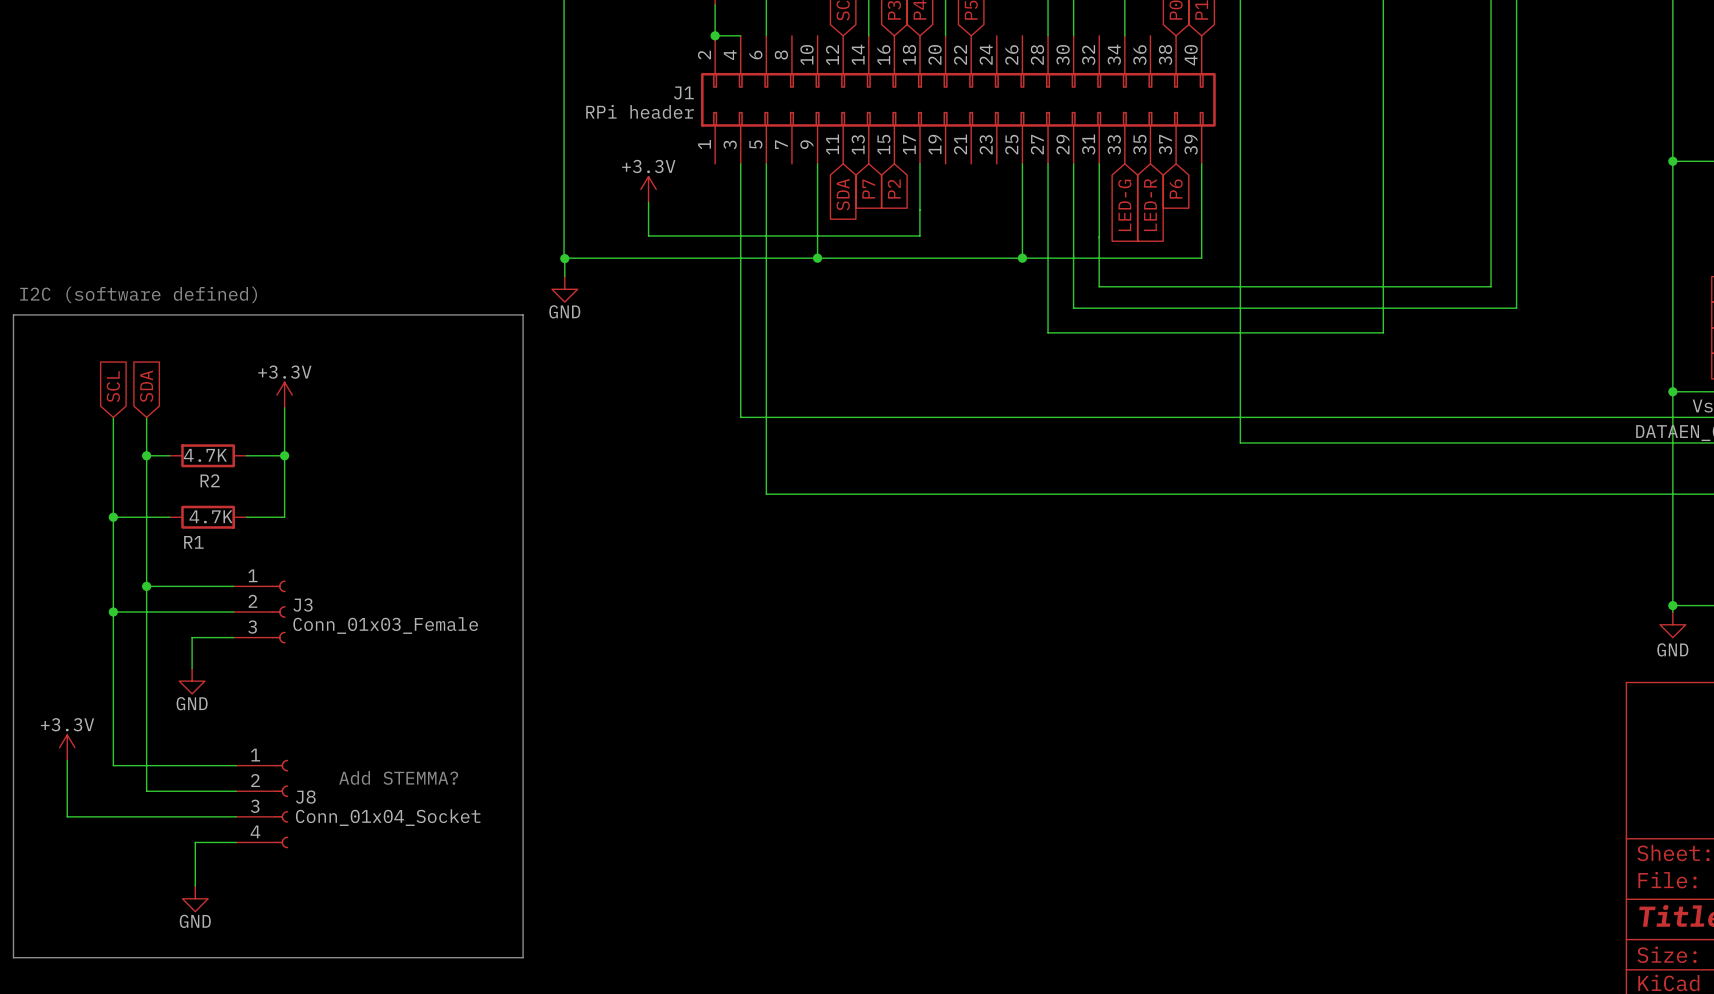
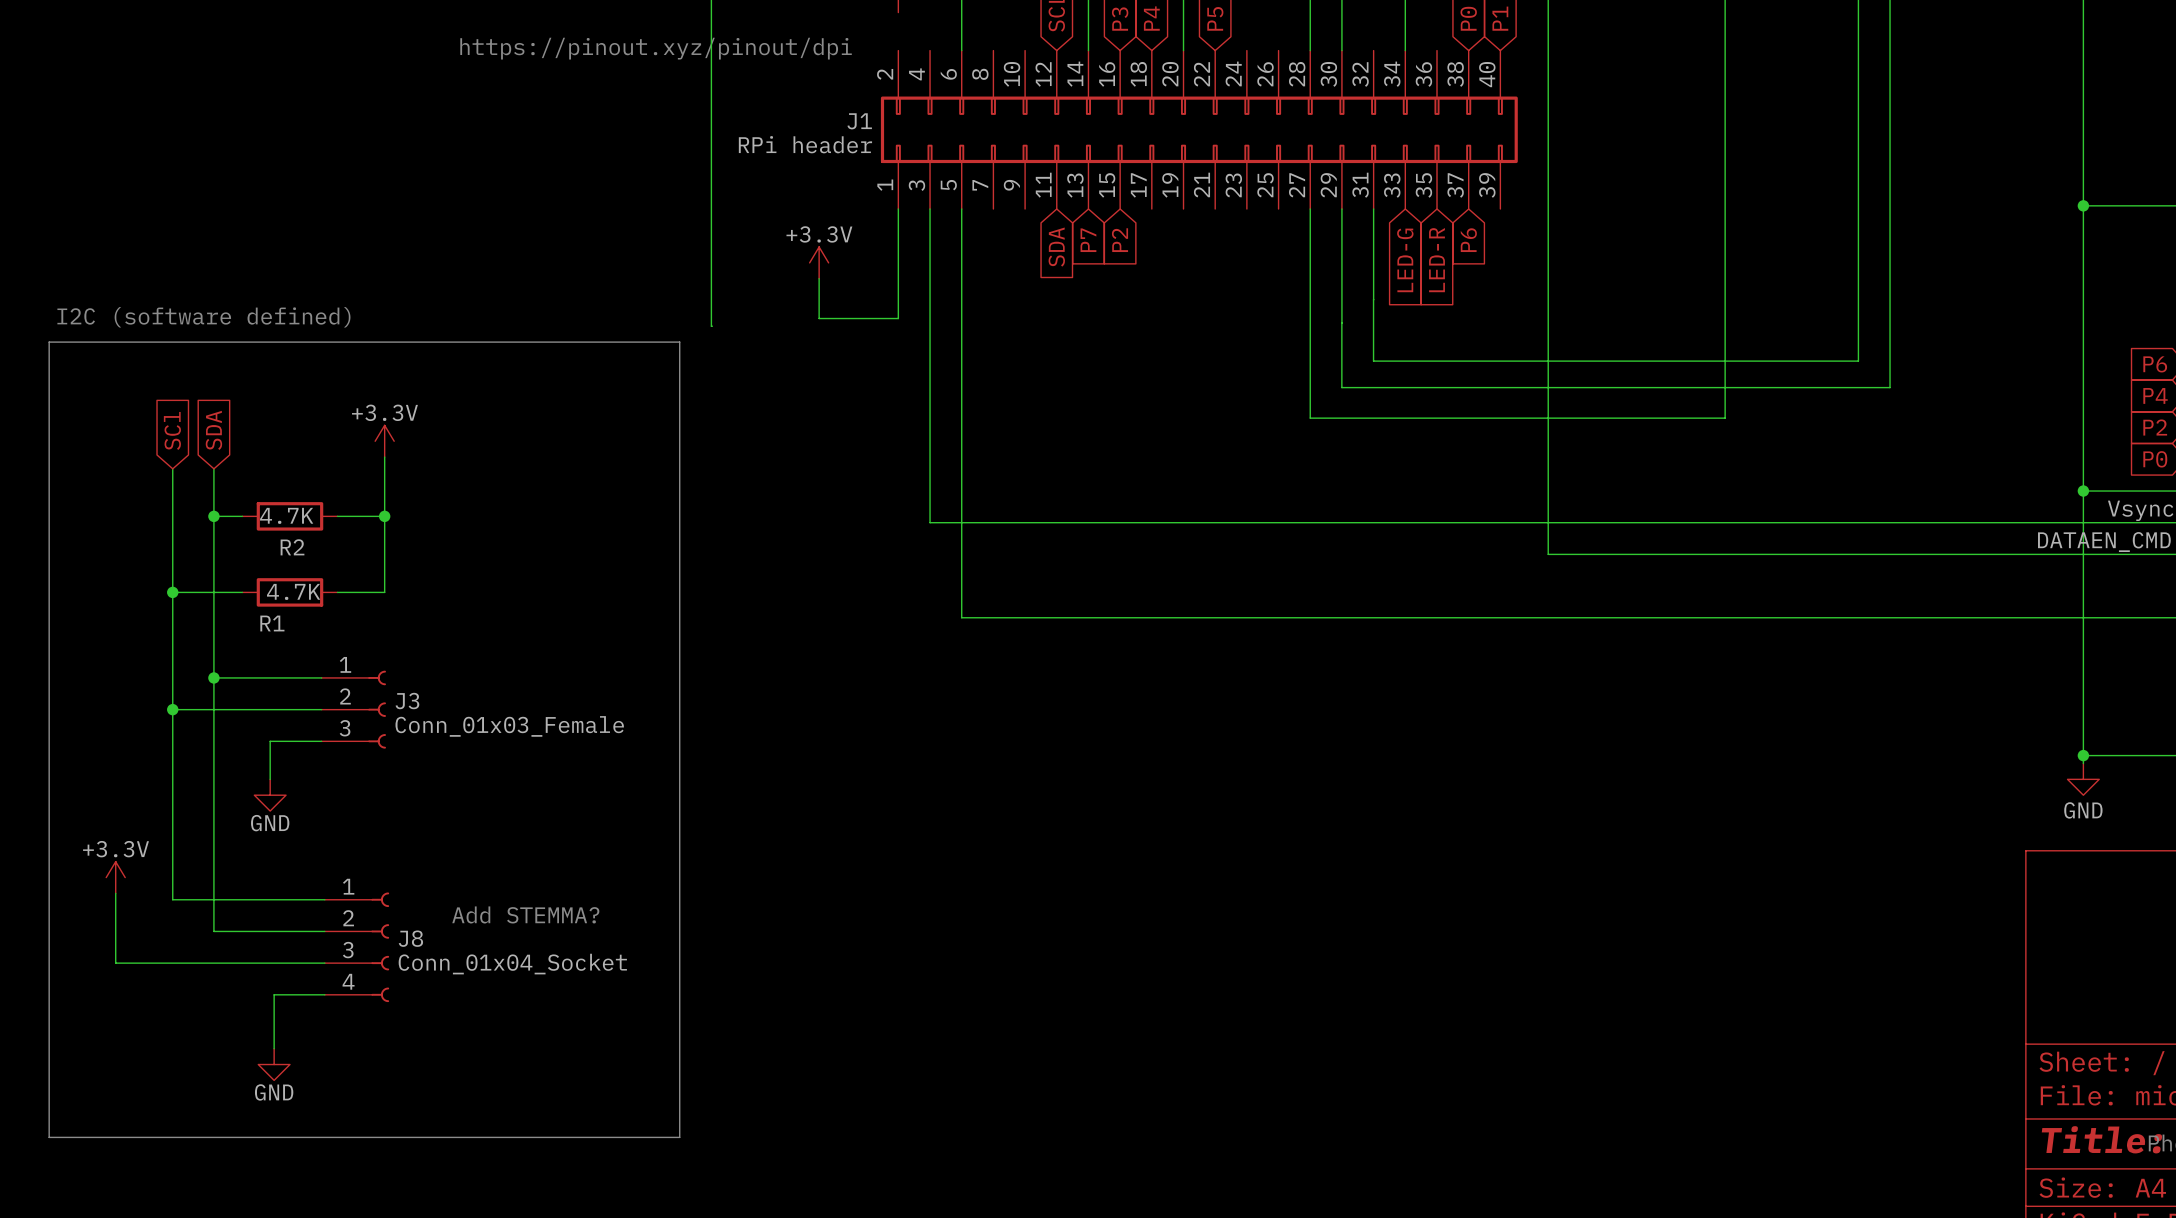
wire: (715, 5) (715, 35) (740, 35) -> none
text: none -> https://pinout.xyz/pinout/dpi (656, 48)
junction: (715, 35) -> none
wire: none -> (898, 209) (898, 318) (819, 318) (819, 278)
wire: (817, 163) (817, 258) -> none
wire: (919, 163) (919, 235) (648, 235) (648, 202) -> none
wire: (1022, 163) (1022, 258) -> none
wire: (1201, 163) (1201, 258) (564, 258) (564, 276) -> none
power symbol position: +3.3V (648, 189) -> +3.3V (819, 262)
junction: (564, 258) -> none
junction: (817, 258) -> none
junction: (1022, 258) -> none
power symbol: GND (564, 289) -> none
text position: I2C (software defined) (138, 294) -> I2C (software defined) (203, 317)
line: (13, 314) (523, 314) (523, 957) (13, 957) (13, 314) -> (49, 342) (679, 342) (679, 1137) (49, 1137) (49, 342)
global label: SCL (113, 386) -> SCl (172, 430)
global label position: SDA (146, 386) -> SDA (213, 430)
power symbol position: +3.3V (284, 395) -> +3.3V (384, 441)
wire: (284, 407) (284, 517) (246, 517) -> (384, 457) (384, 592) (337, 592)
junction: none -> (213, 516)
wire: (113, 417) (113, 765) (236, 765) -> (172, 468) (172, 899) (324, 899)
wire: (146, 417) (146, 791) (236, 791) -> (213, 468) (213, 931) (324, 931)
wire: (146, 455) (169, 455) -> (213, 516) (242, 516)
junction: (146, 455) -> none
R2 position: (208, 455) -> (289, 516)
wire: (246, 455) (284, 455) -> (337, 516) (384, 516)
junction position: (284, 455) -> (384, 516)
junction: none -> (172, 592)
wire: (113, 517) (169, 517) -> (172, 592) (242, 592)
junction: (113, 517) -> none
R1 position: (208, 517) -> (289, 592)
junction: none -> (213, 677)
junction: none -> (172, 709)
wire: (146, 586) (233, 586) -> (213, 677) (321, 677)
junction: (146, 586) -> none
wire: (113, 611) (233, 611) -> (172, 709) (321, 709)
junction: (113, 611) -> none
J3 position: (259, 611) -> (353, 709)
wire: (233, 637) (192, 637) (192, 668) -> (321, 741) (270, 741) (270, 779)
power symbol position: GND (192, 681) -> GND (270, 795)
power symbol position: +3.3V (67, 747) -> +3.3V (115, 877)
wire: (67, 760) (67, 816) (236, 816) -> (115, 893) (115, 963) (324, 963)
text position: Add STEMMA? (398, 777) -> Add STEMMA? (525, 914)
J8 position: (262, 804) -> (356, 947)
wire: (236, 842) (195, 842) (195, 885) -> (324, 994) (274, 994) (274, 1048)
power symbol position: GND (195, 898) -> GND (274, 1064)

